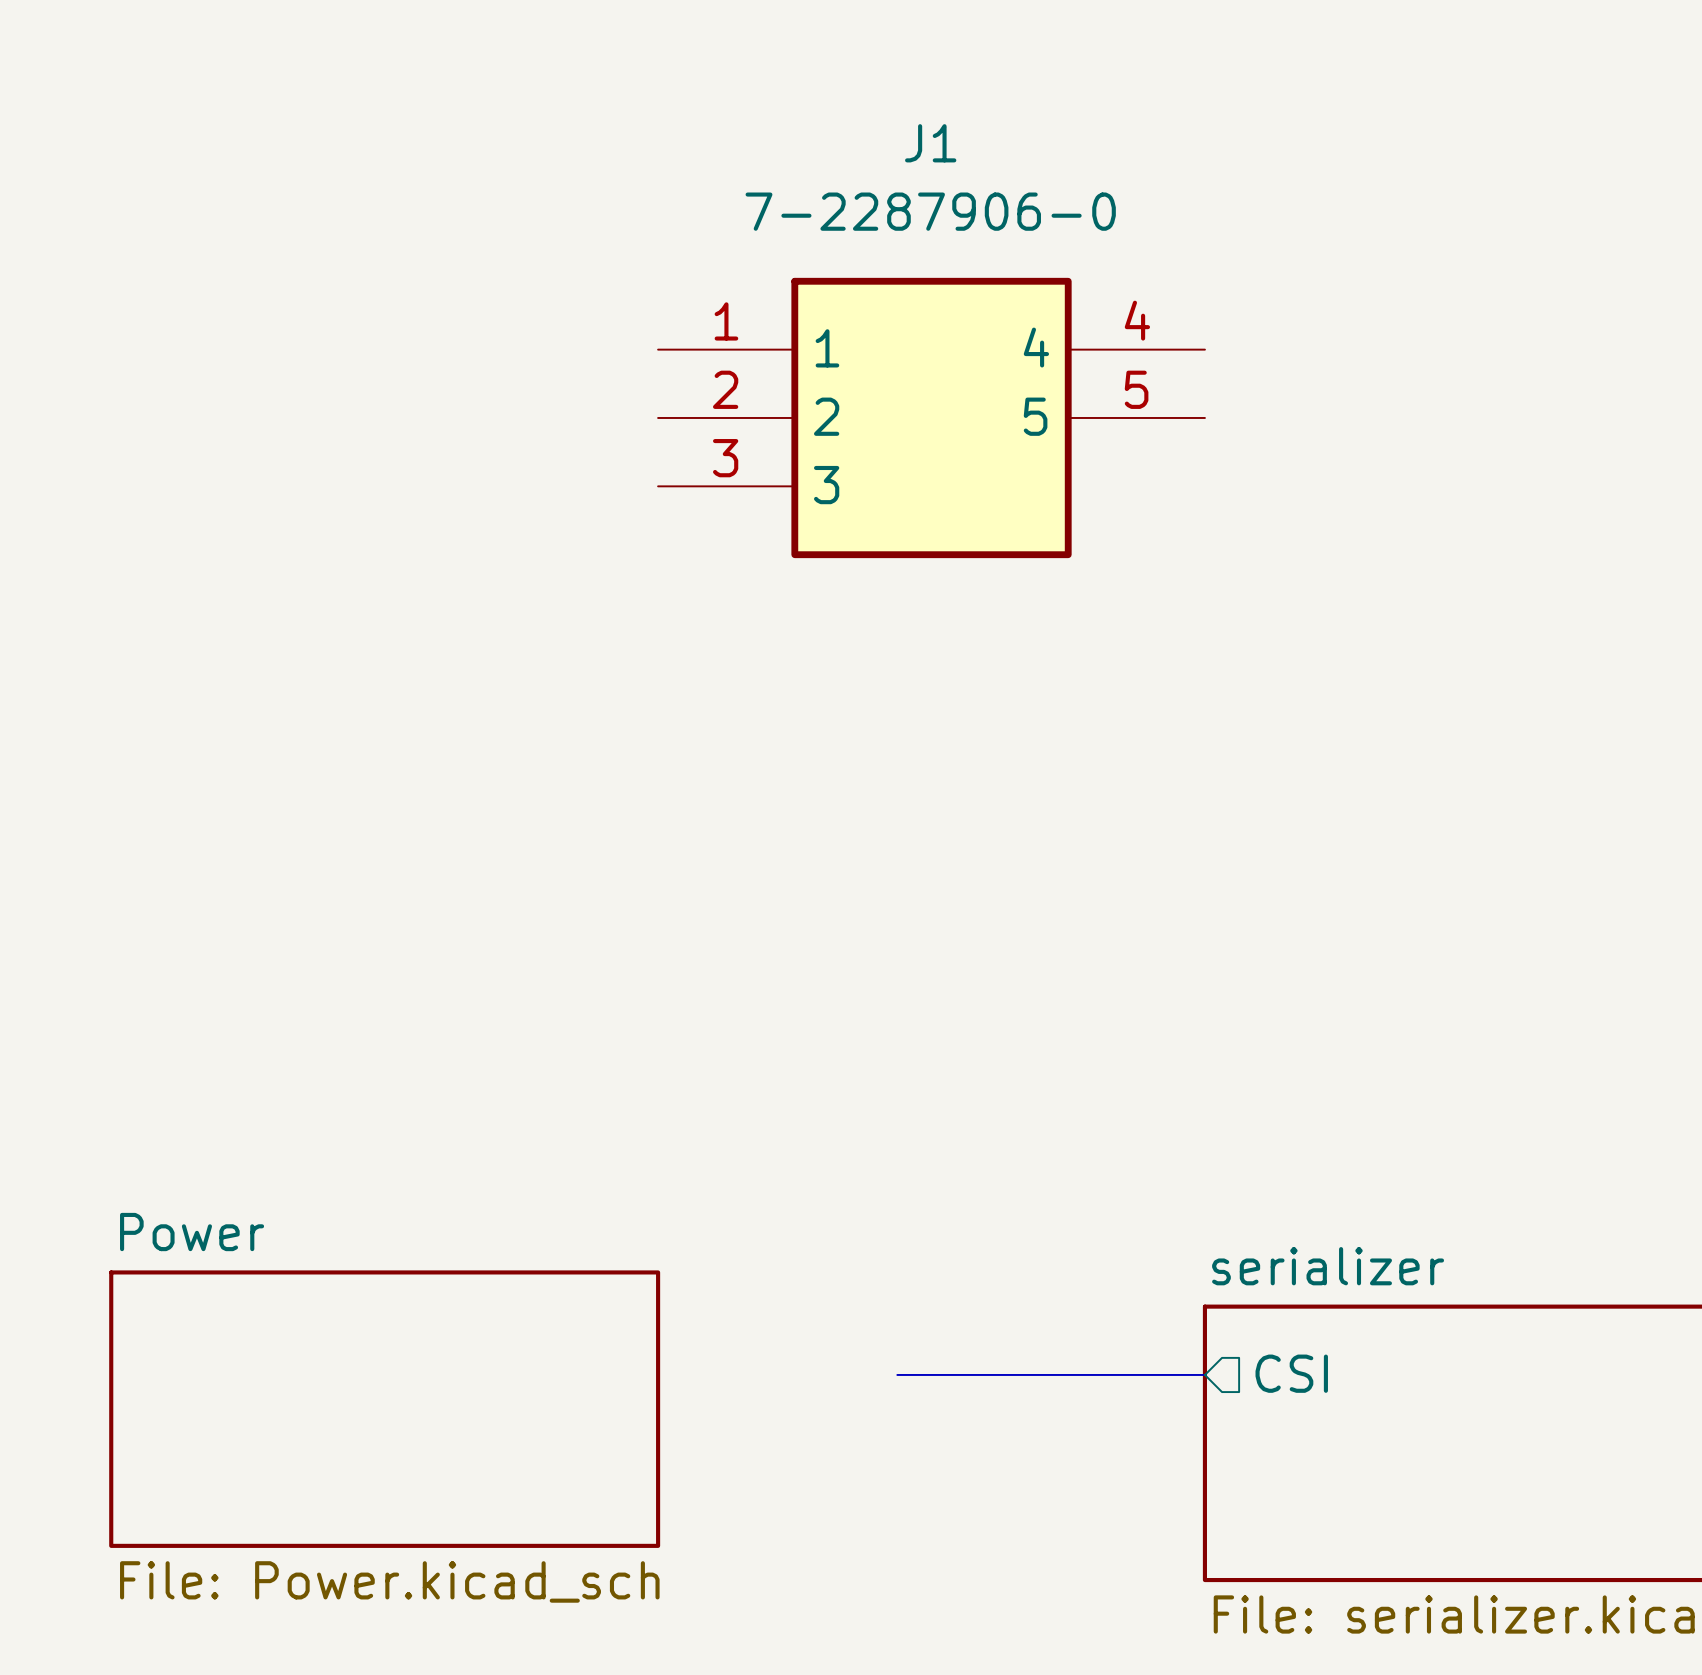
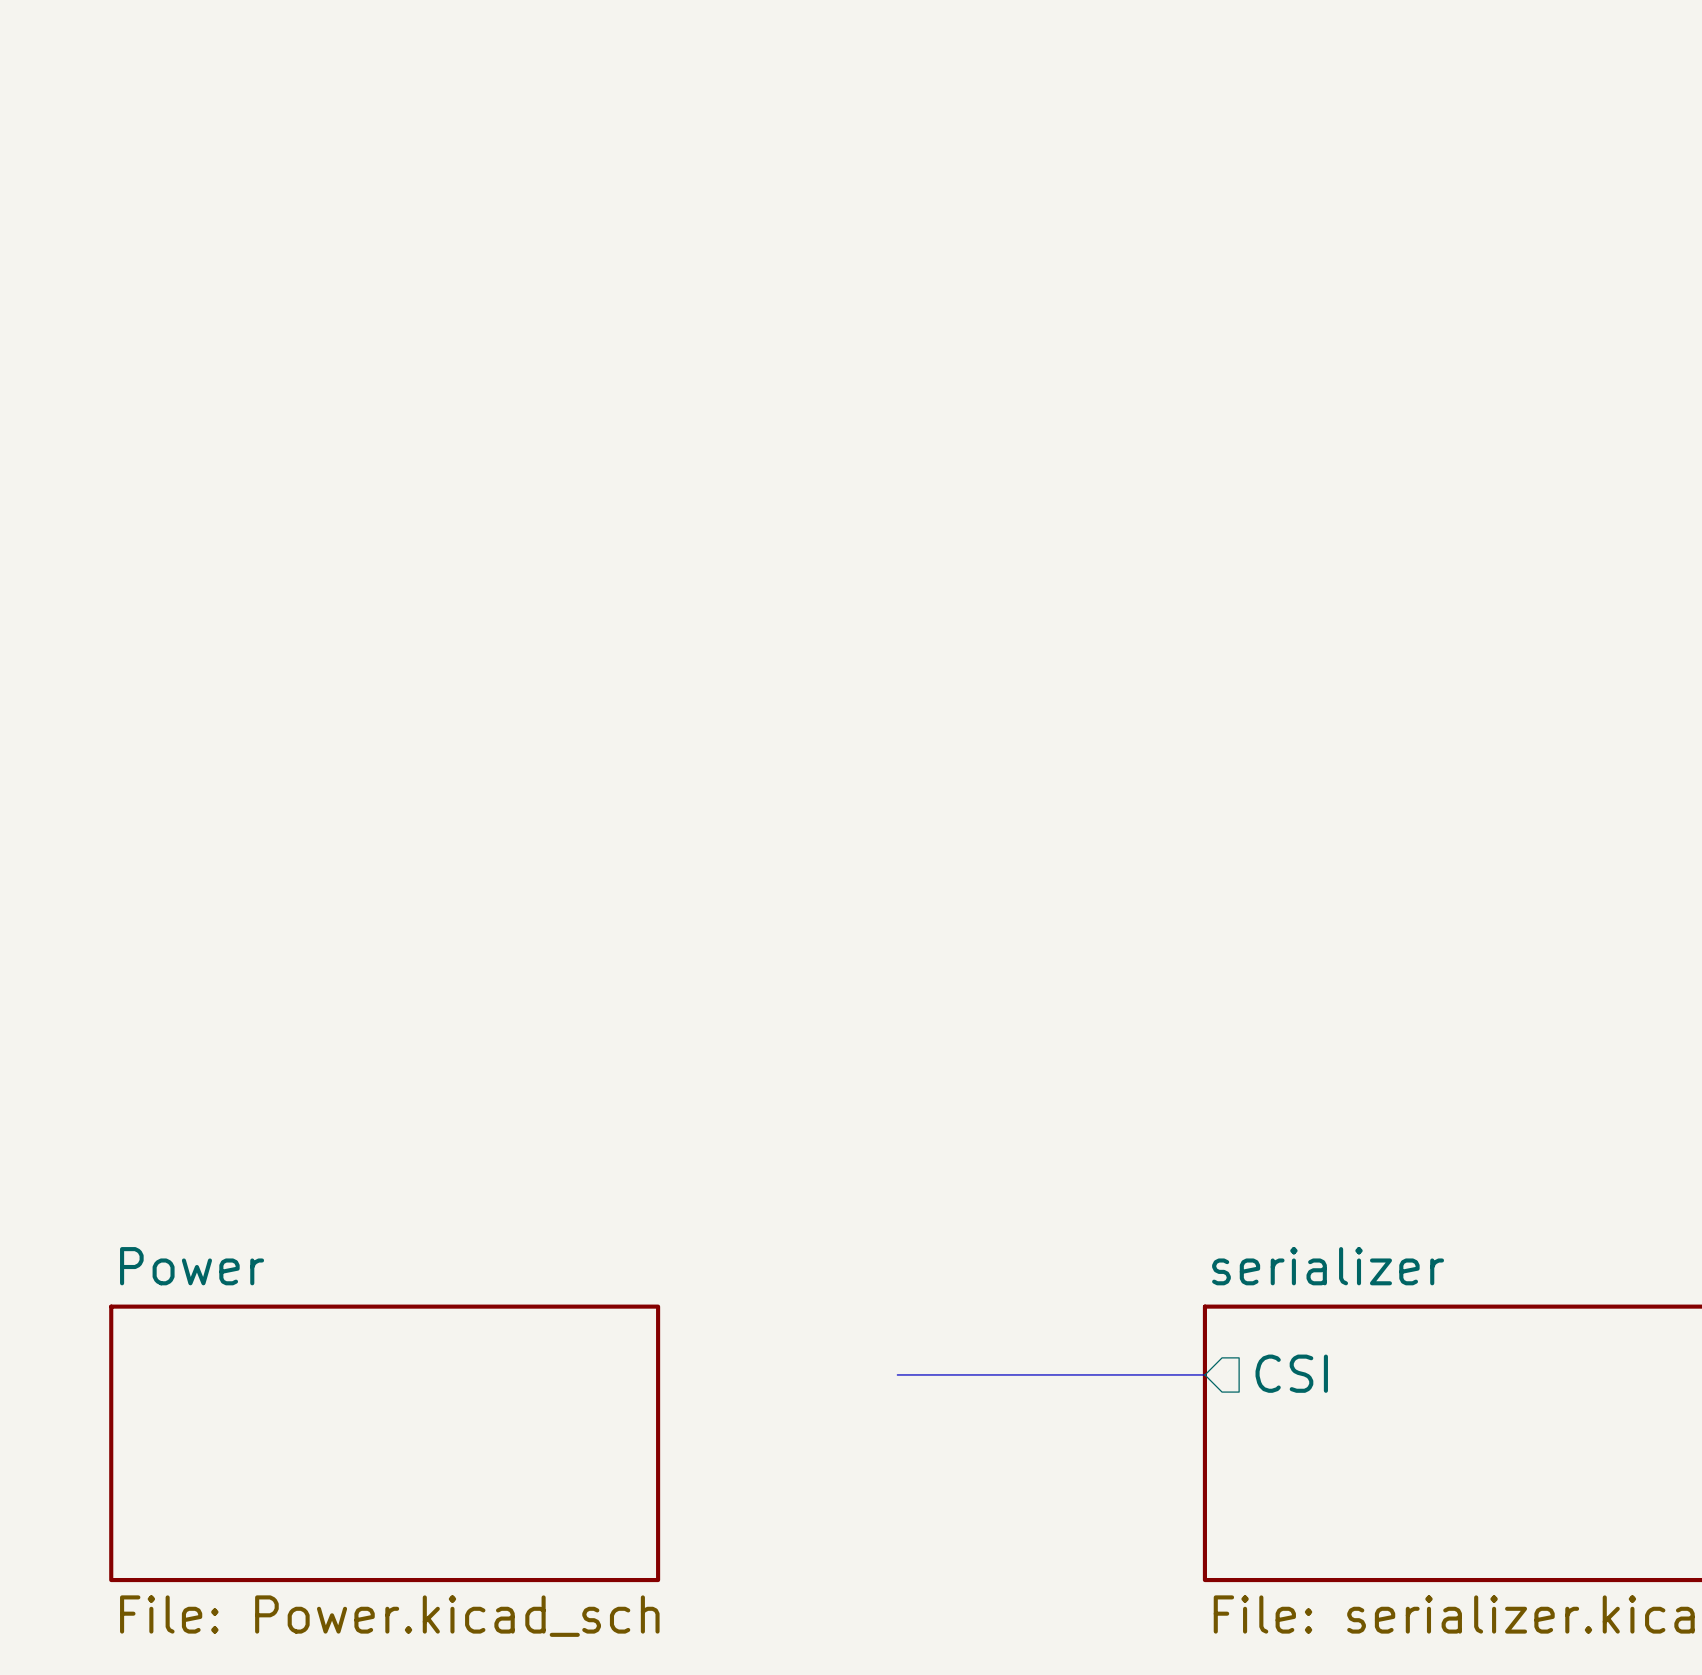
J1: 7-2287906-0 (931, 417) -> none
sheet Power position: (384, 1409) -> (384, 1443)

